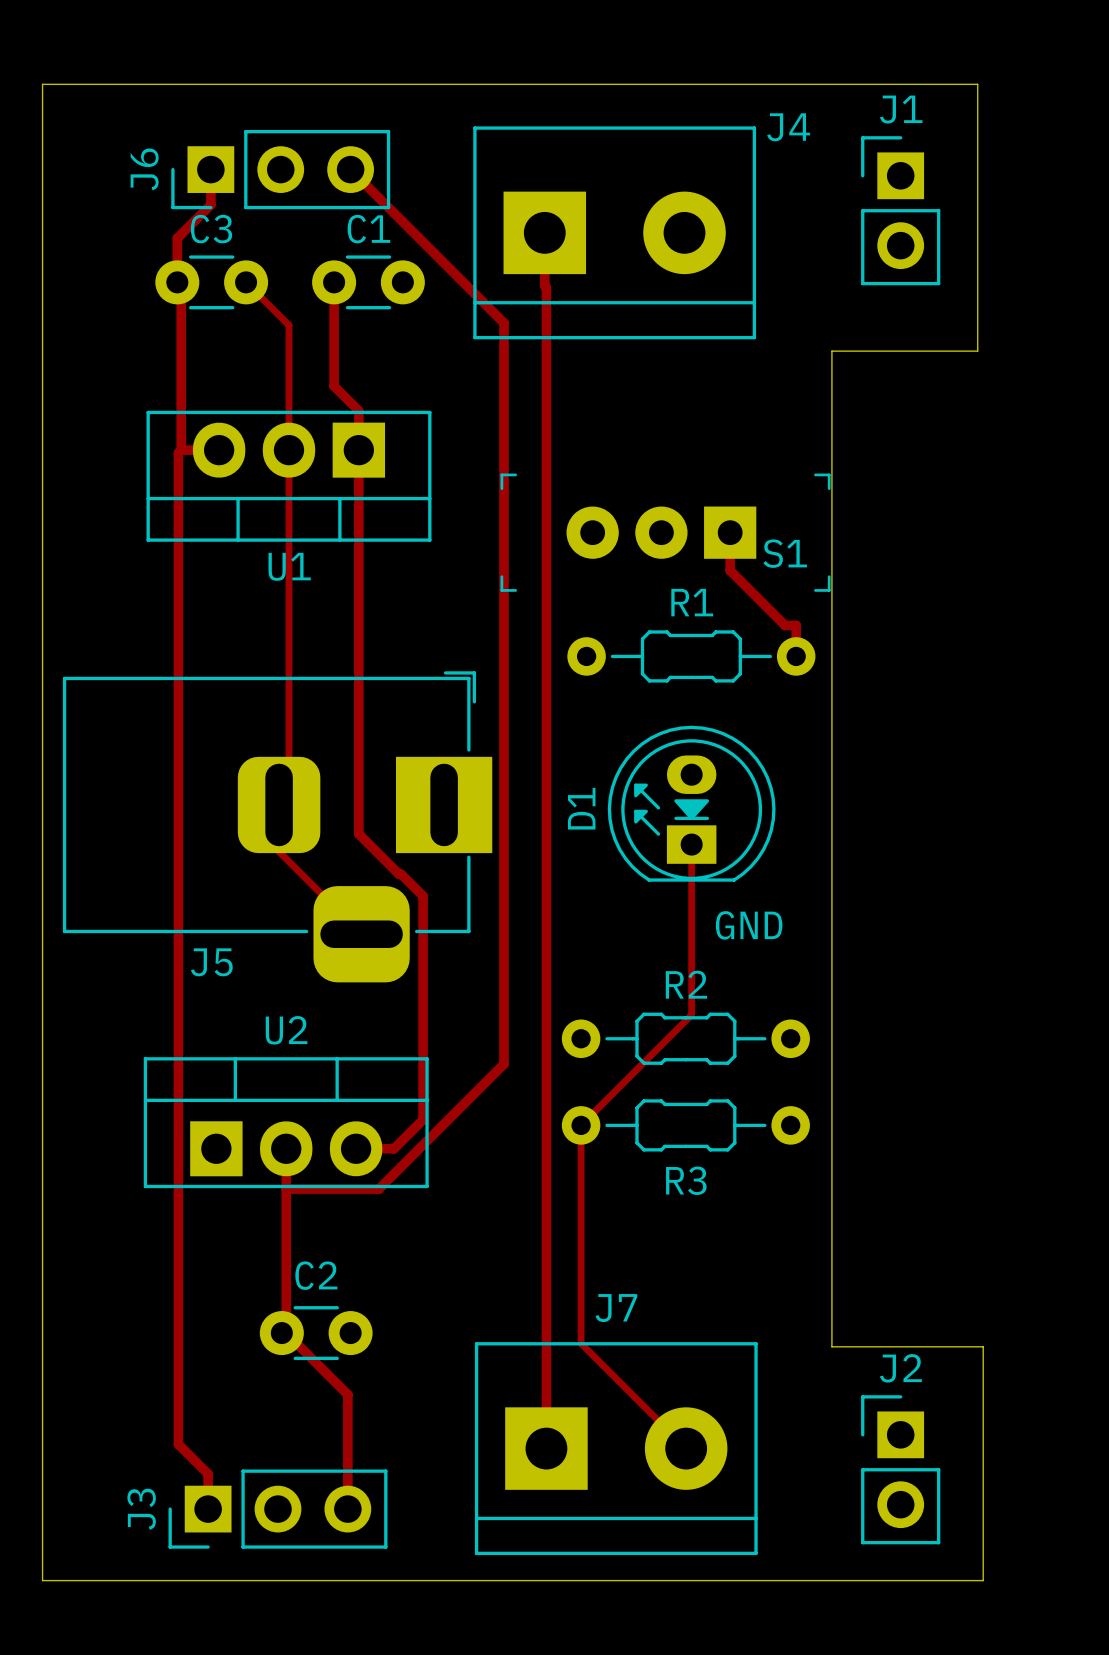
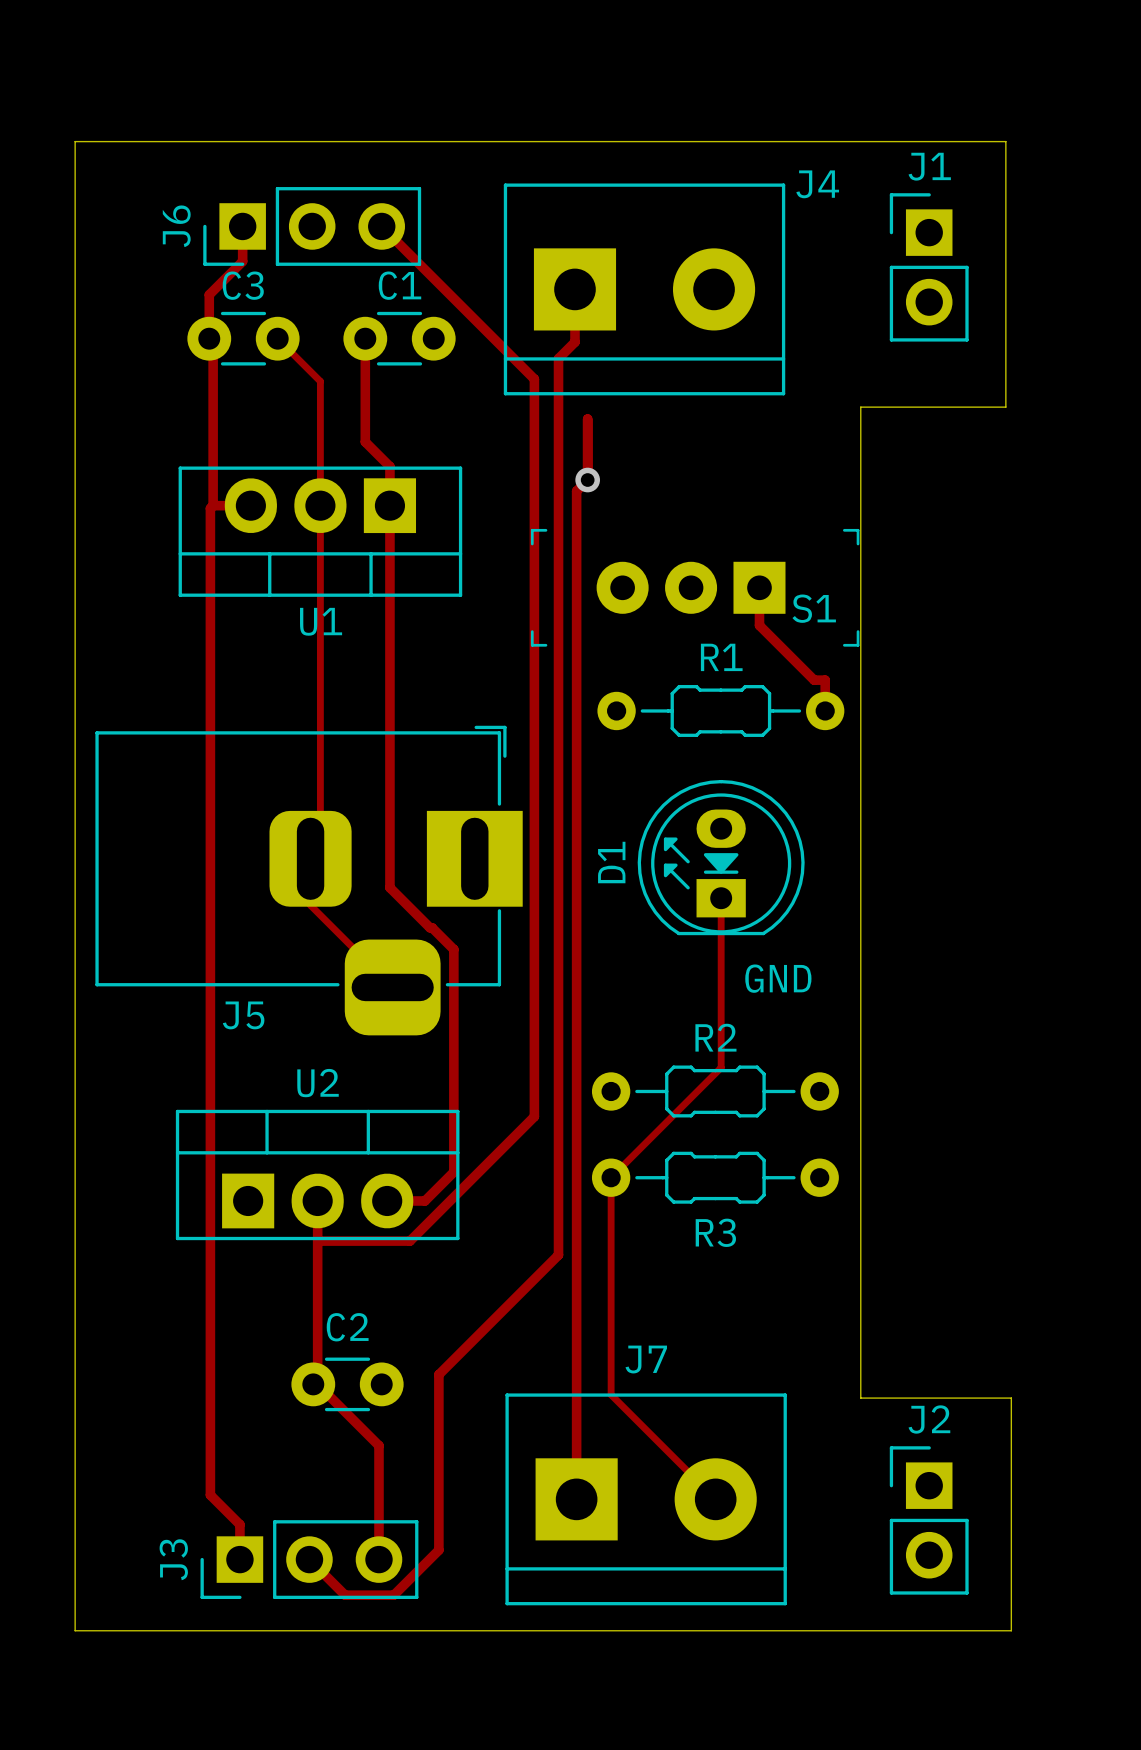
track: (544, 285) (546, 287) (546, 435) -> (587, 418) (587, 480) (576, 491)
track: none -> (574, 342) (558, 358) (558, 1255) (438, 1374) (438, 1550) (393, 1595) (345, 1595) (309, 1559)
via: none -> (587, 480)

